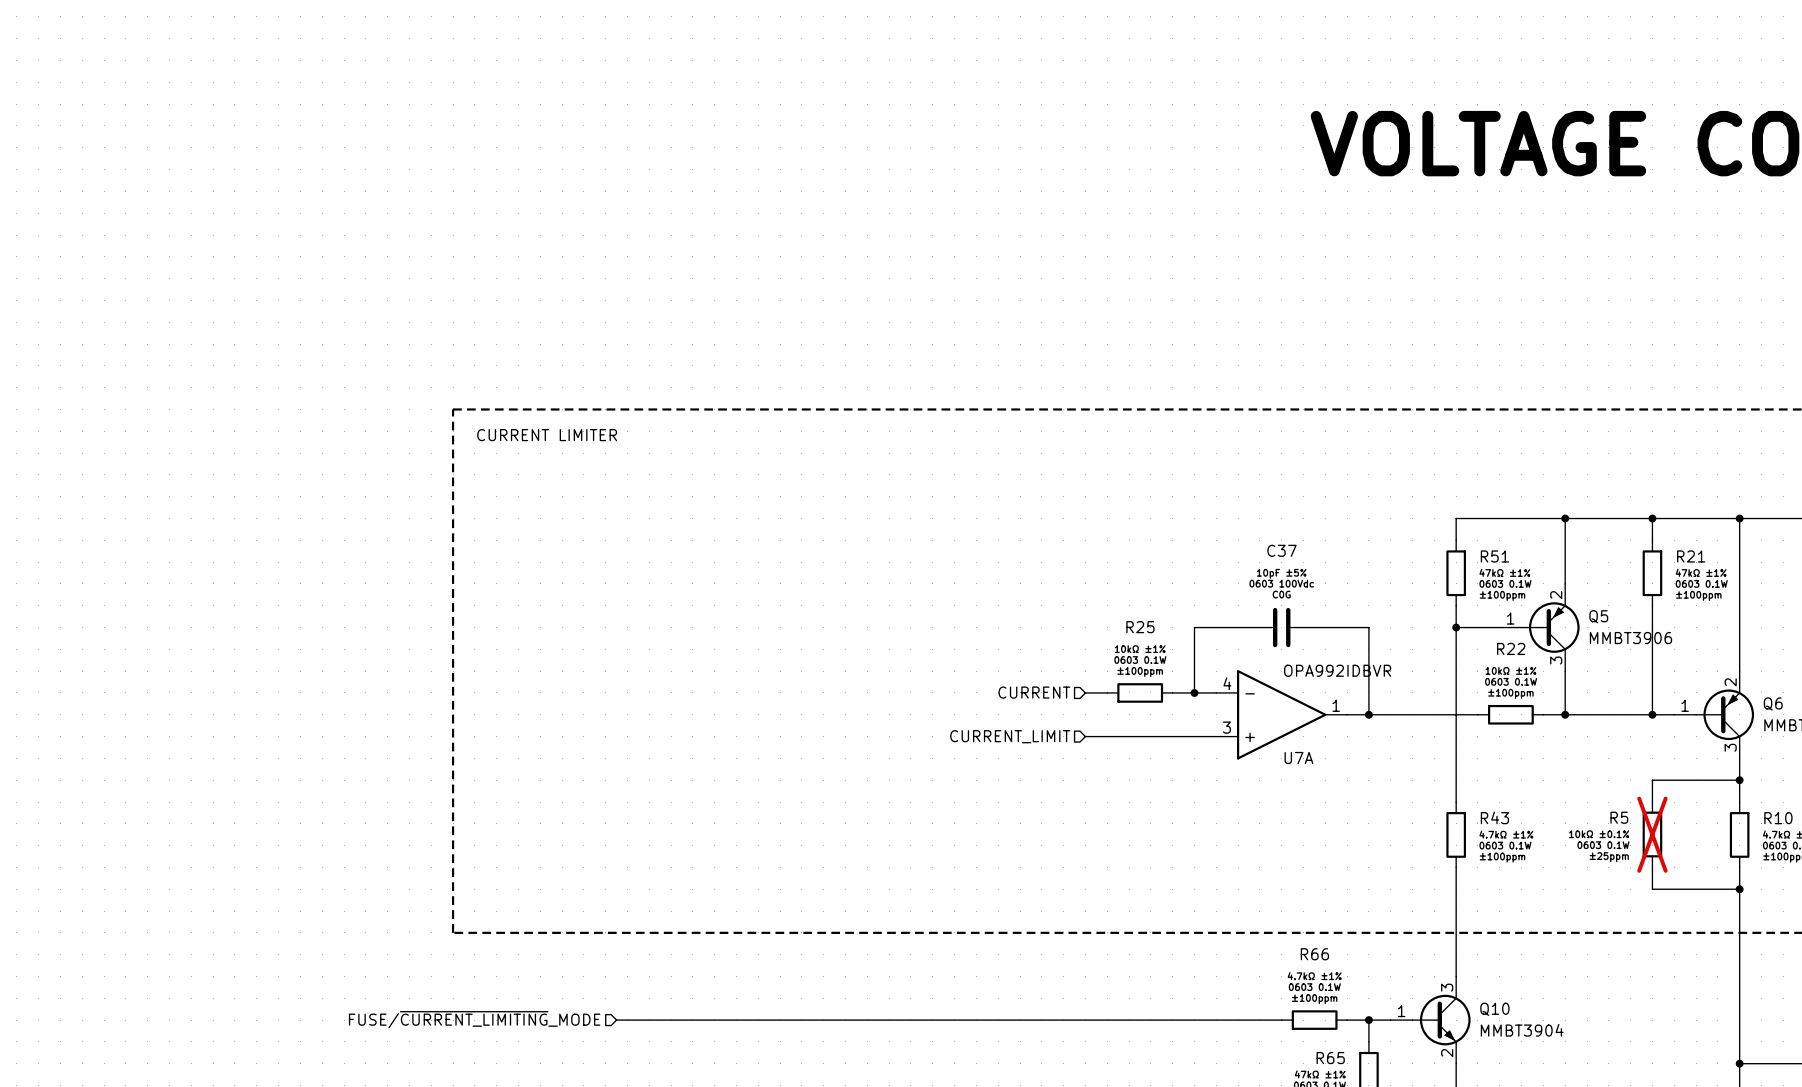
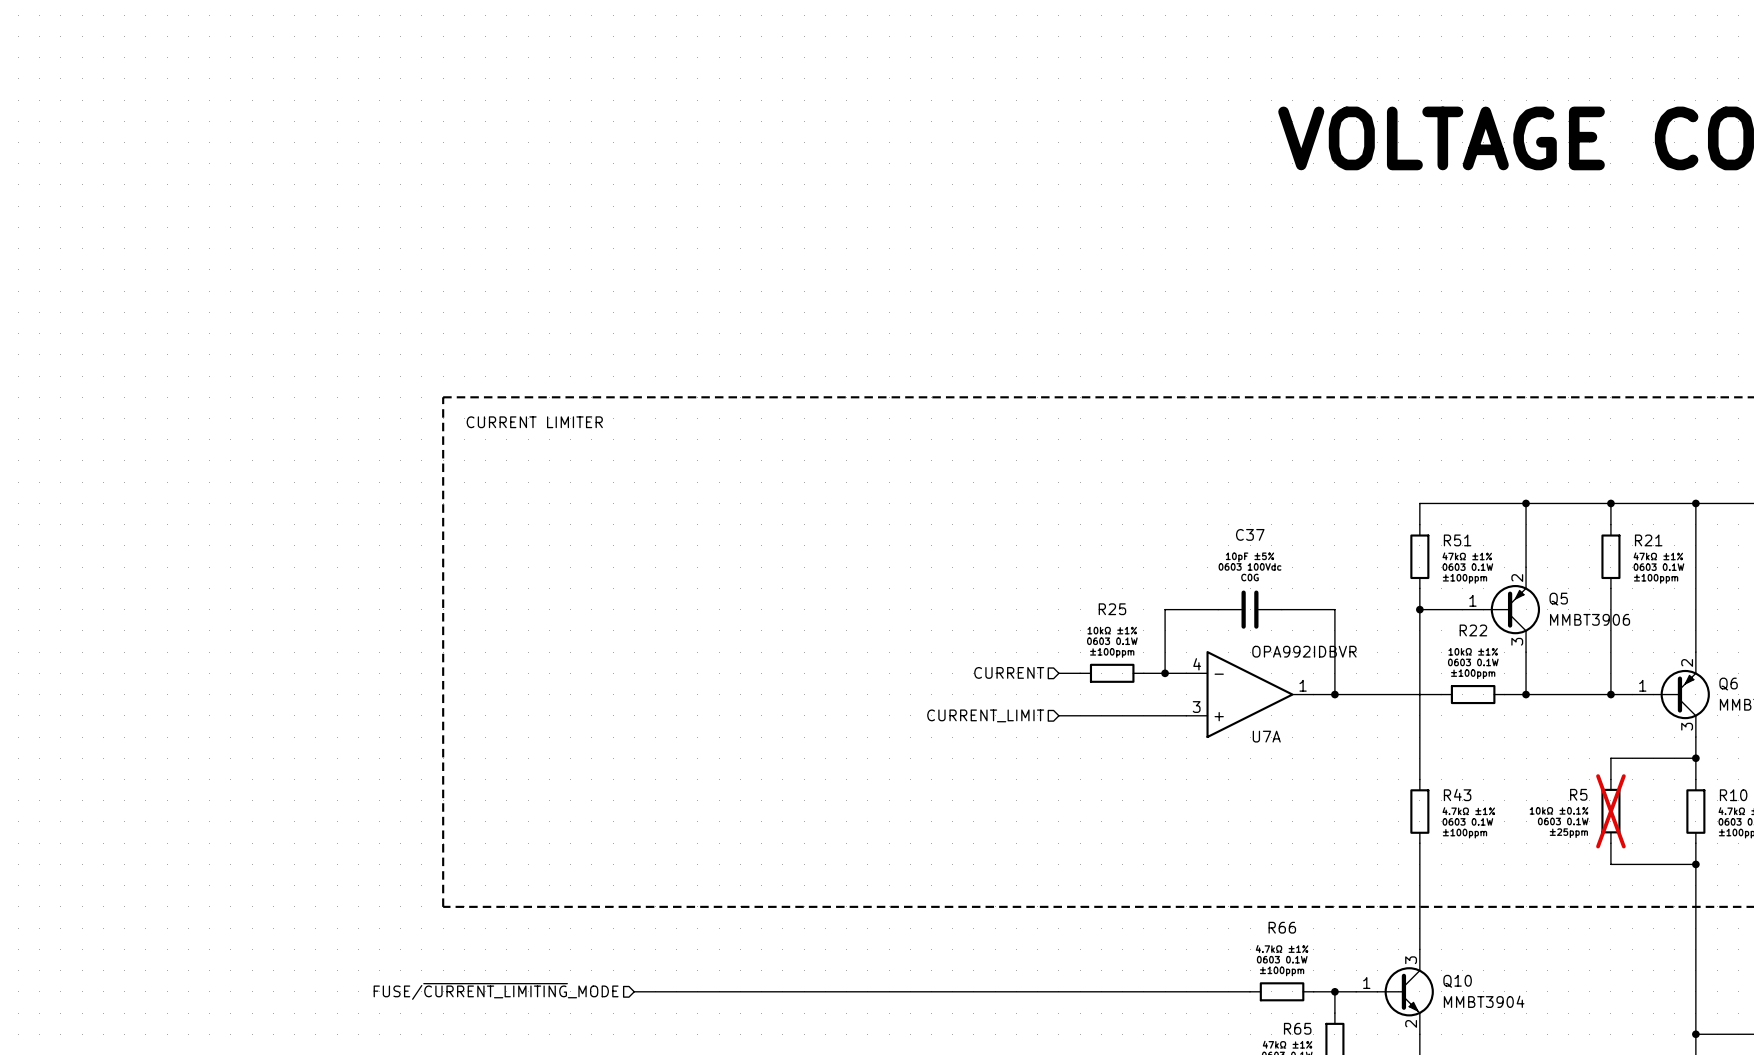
hierarchical label position: FUSE/~{CURRENT_LIMITING}_MODE (474, 1019) -> FUSE/~{CURRENT_LIMITING}_MODE (496, 991)
wire: (616, 1020) (649, 1020) -> none

